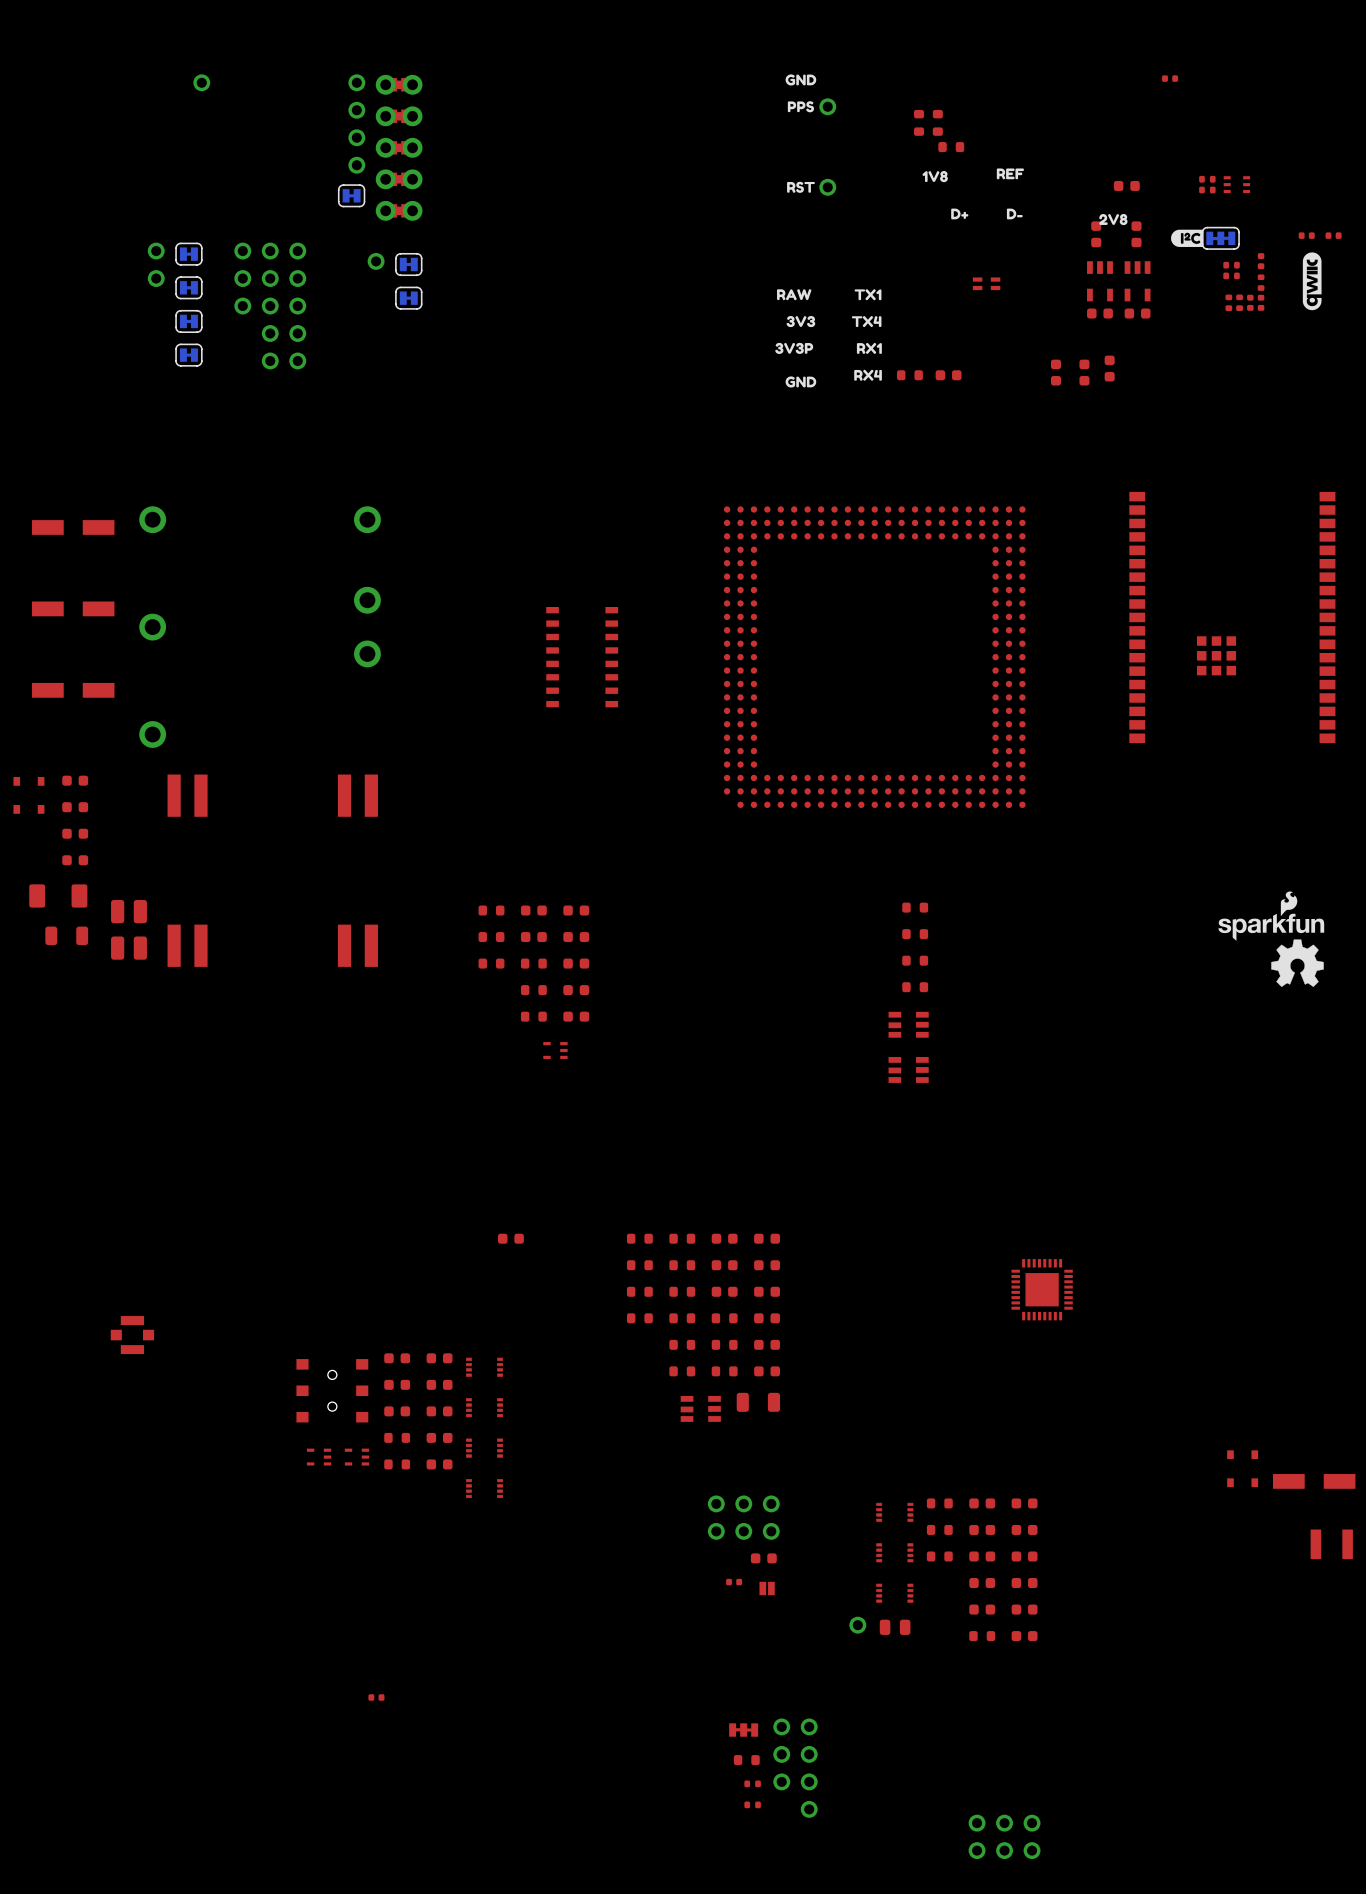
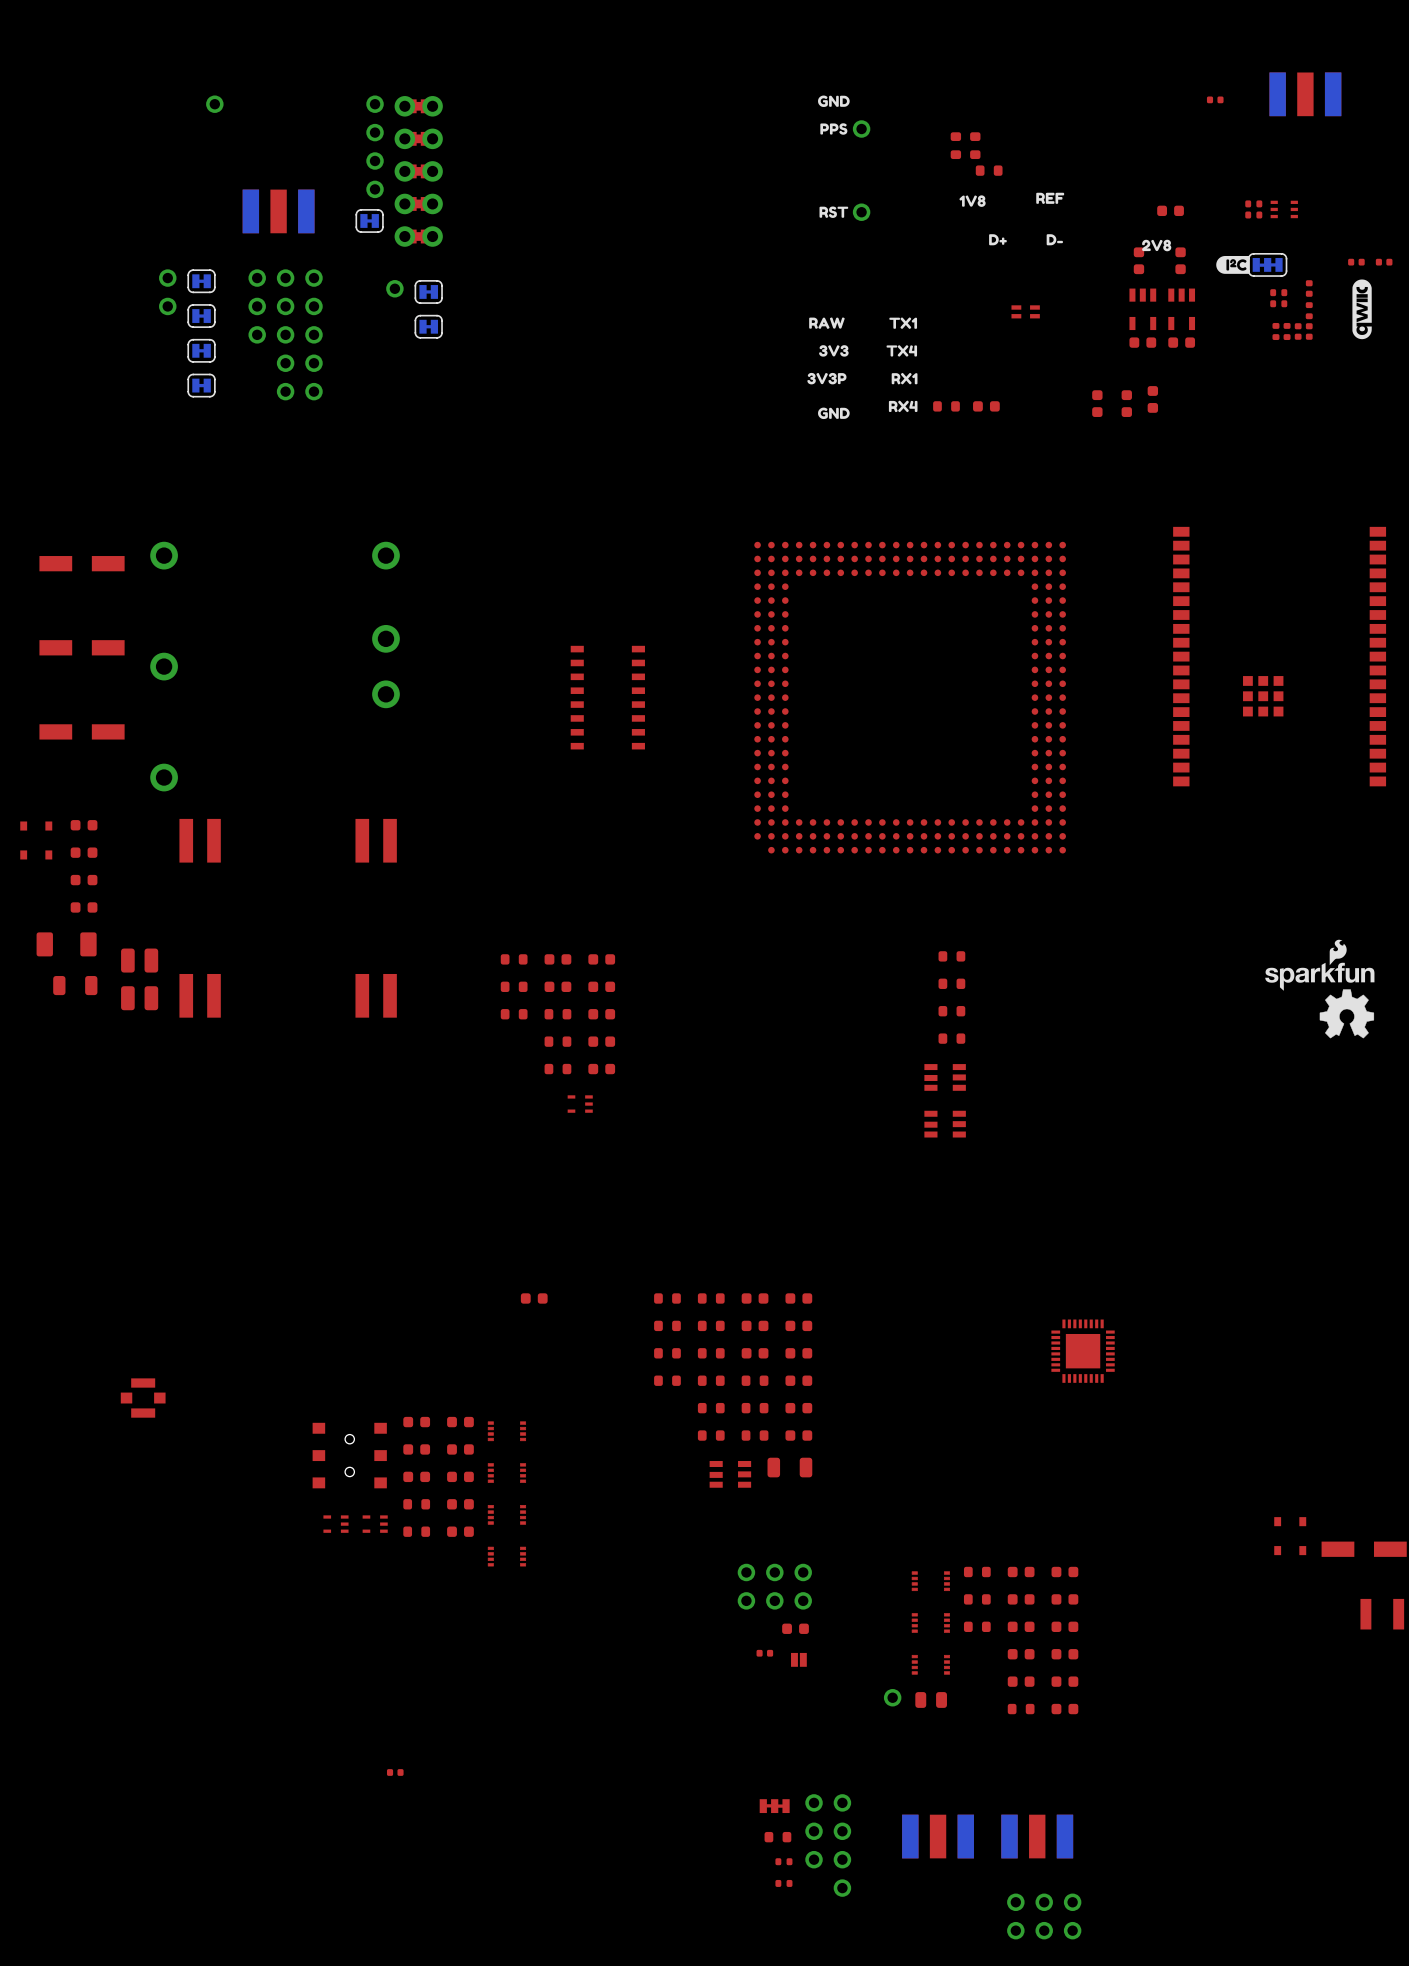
part: none -> (1305, 94)
part: none -> (278, 211)
part: none -> (938, 1836)
part: none -> (1037, 1836)

